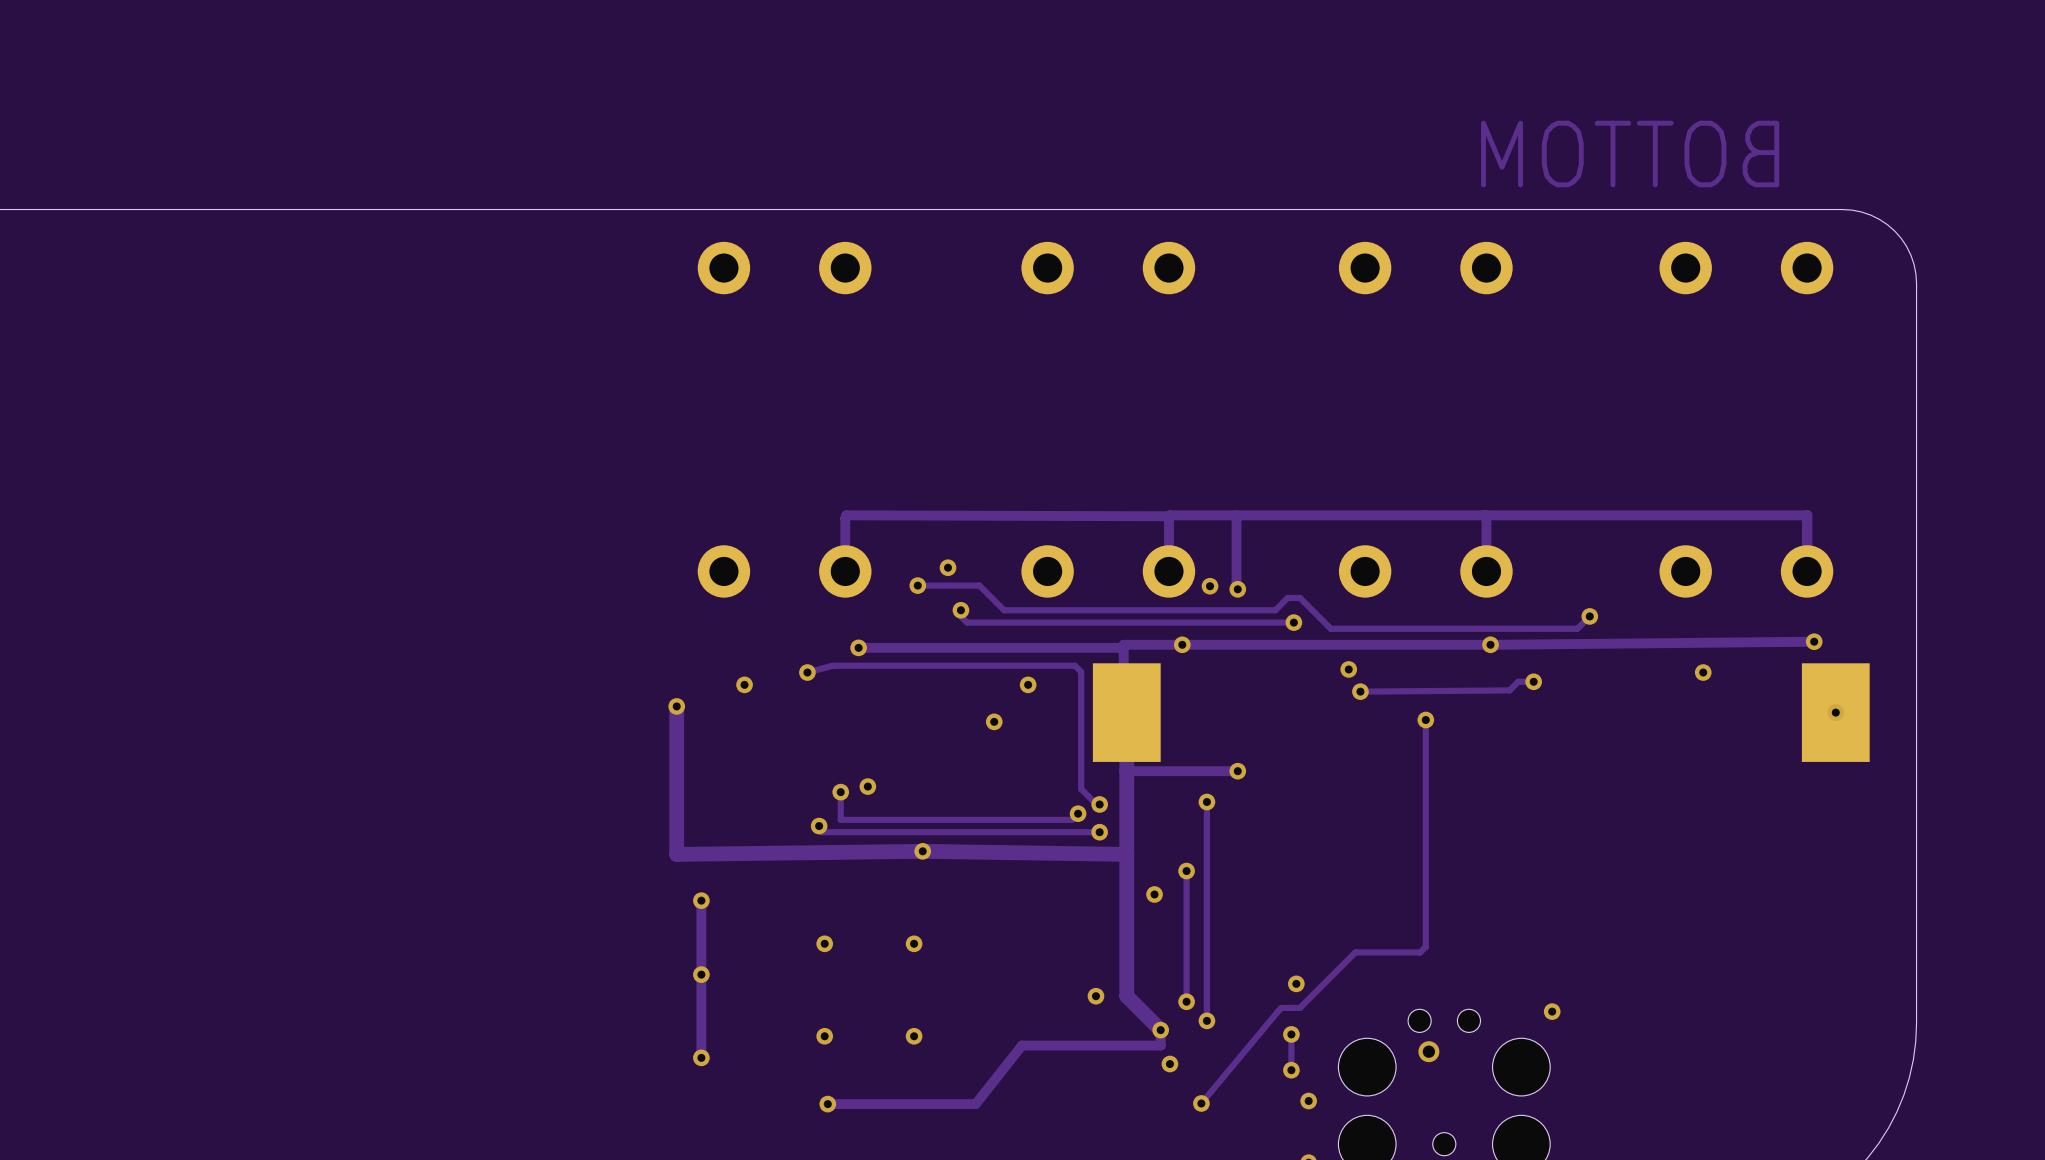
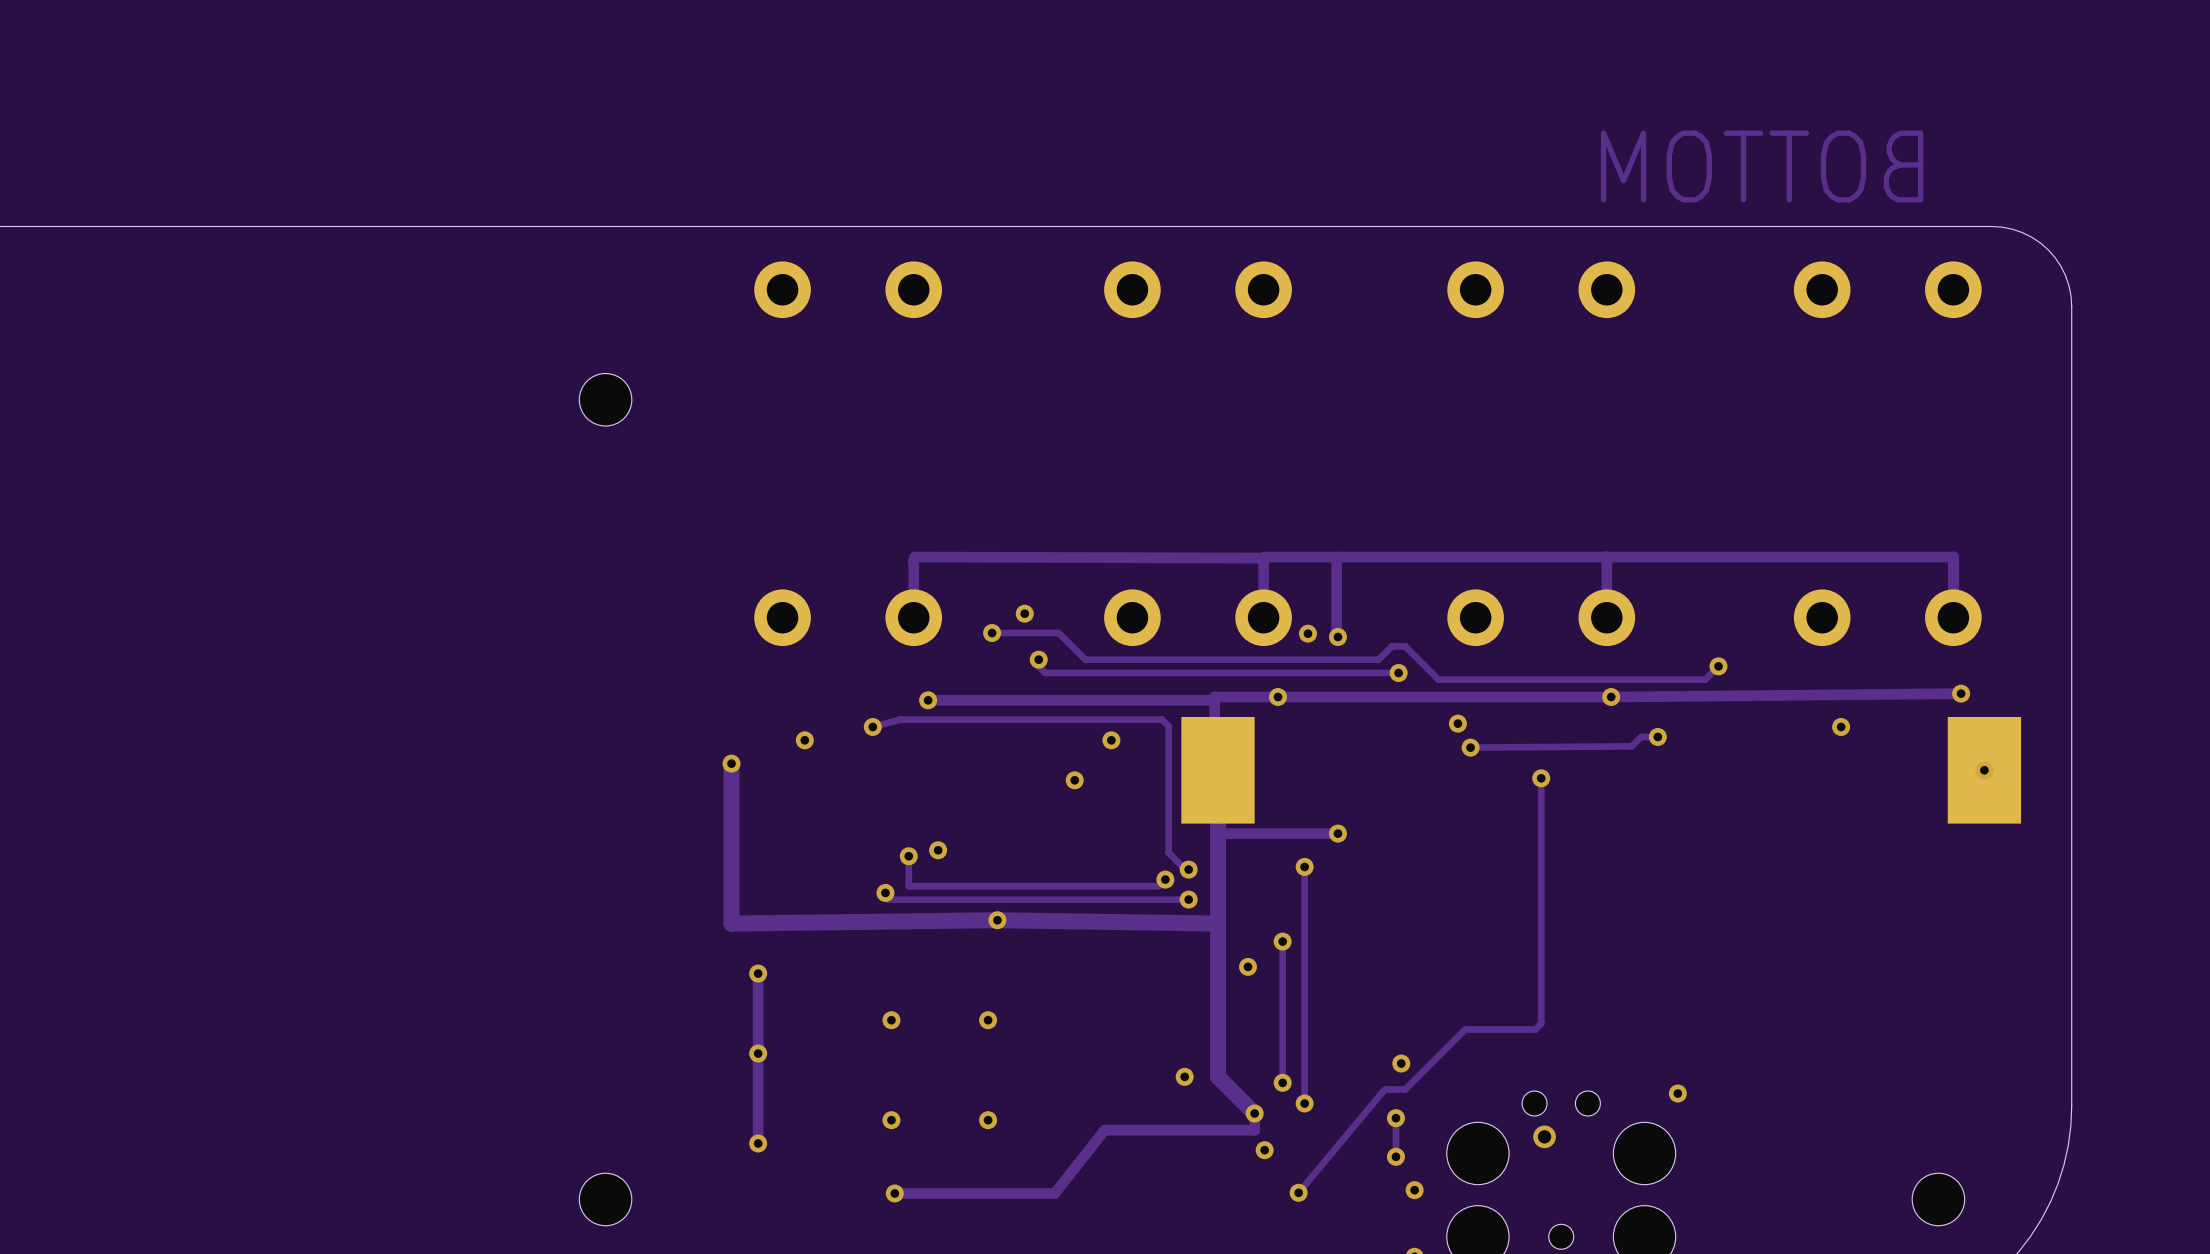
hole: none -> (605, 399)
hole: none -> (605, 1199)
hole: none -> (1938, 1199)

